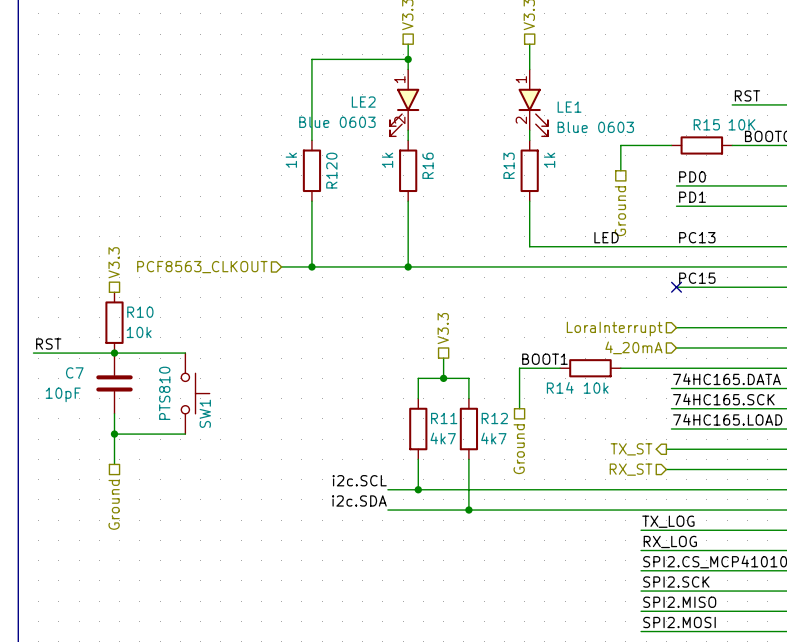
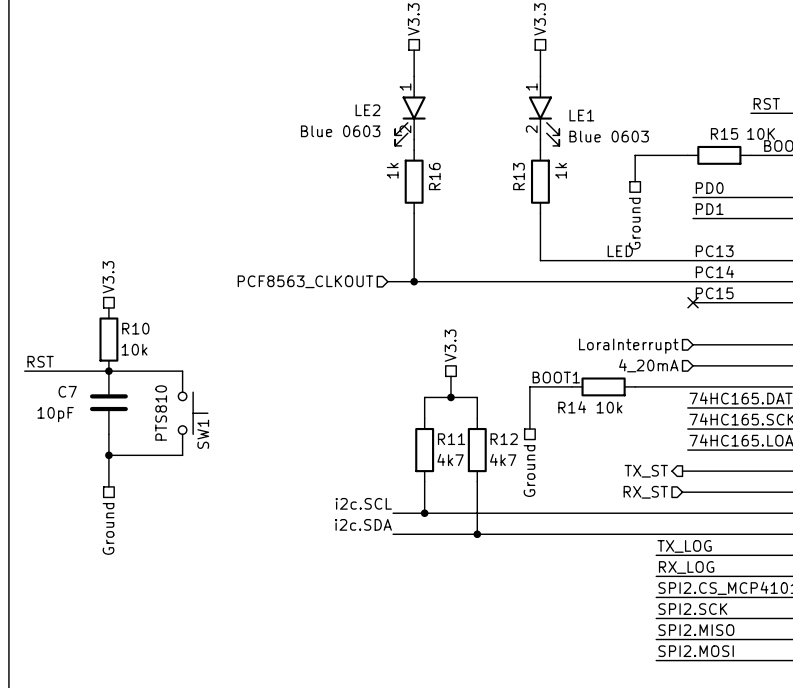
wire: (408, 59) (311, 59) (311, 140) -> none
junction: (408, 59) -> none
R120: 1k (311, 170) -> none
wire: (311, 201) (311, 266) -> none
label: none -> PC14 (714, 272)
wire: (281, 266) (382, 266) -> none
junction: (311, 266) -> none
hierarchical label position: PCF8563_CLKOUT (202, 267) -> PCF8563_CLKOUT (305, 281)

